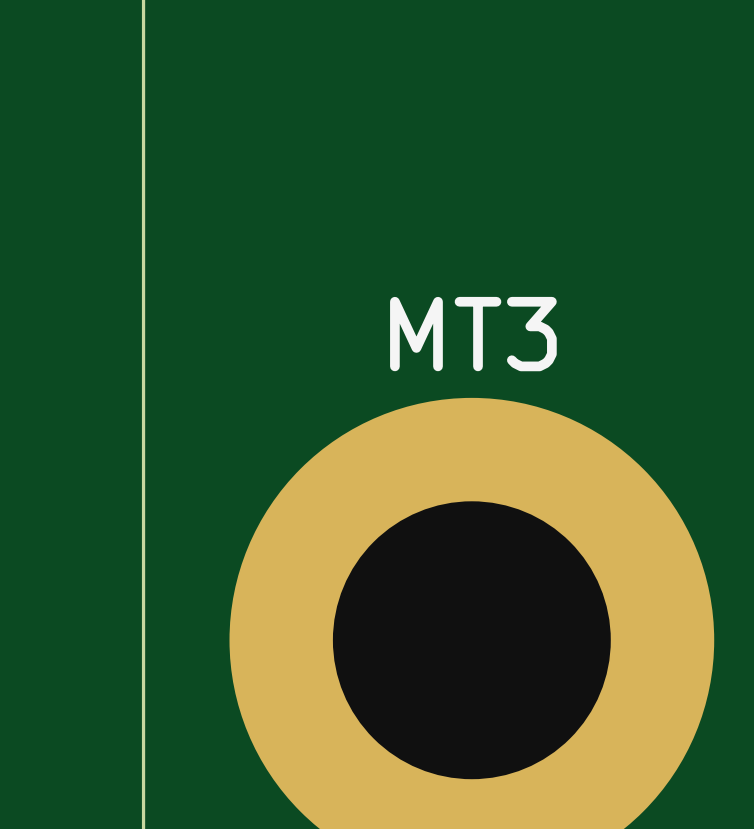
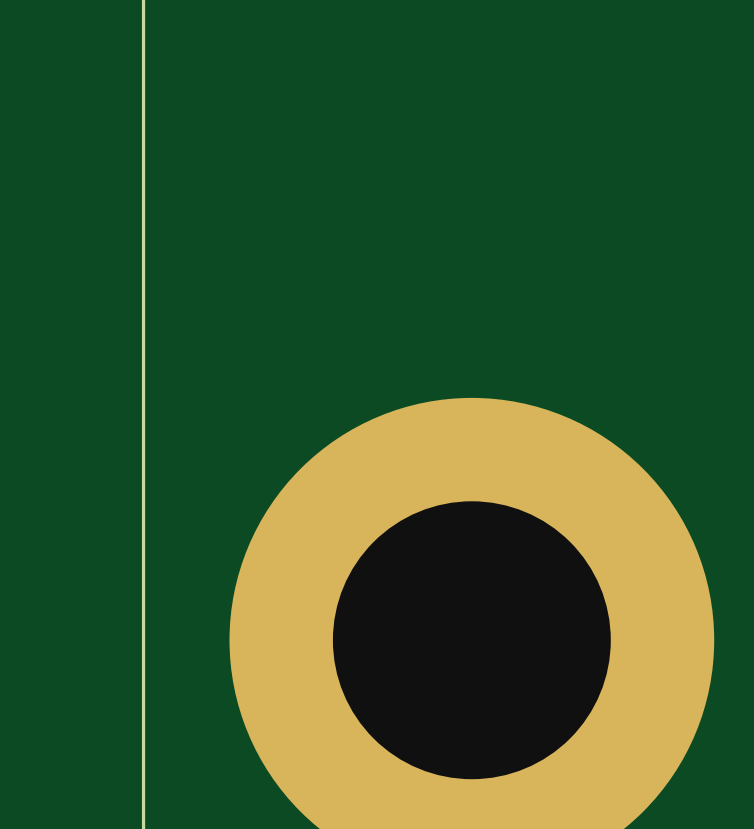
MT3 name: MT3 (473, 334) -> none

